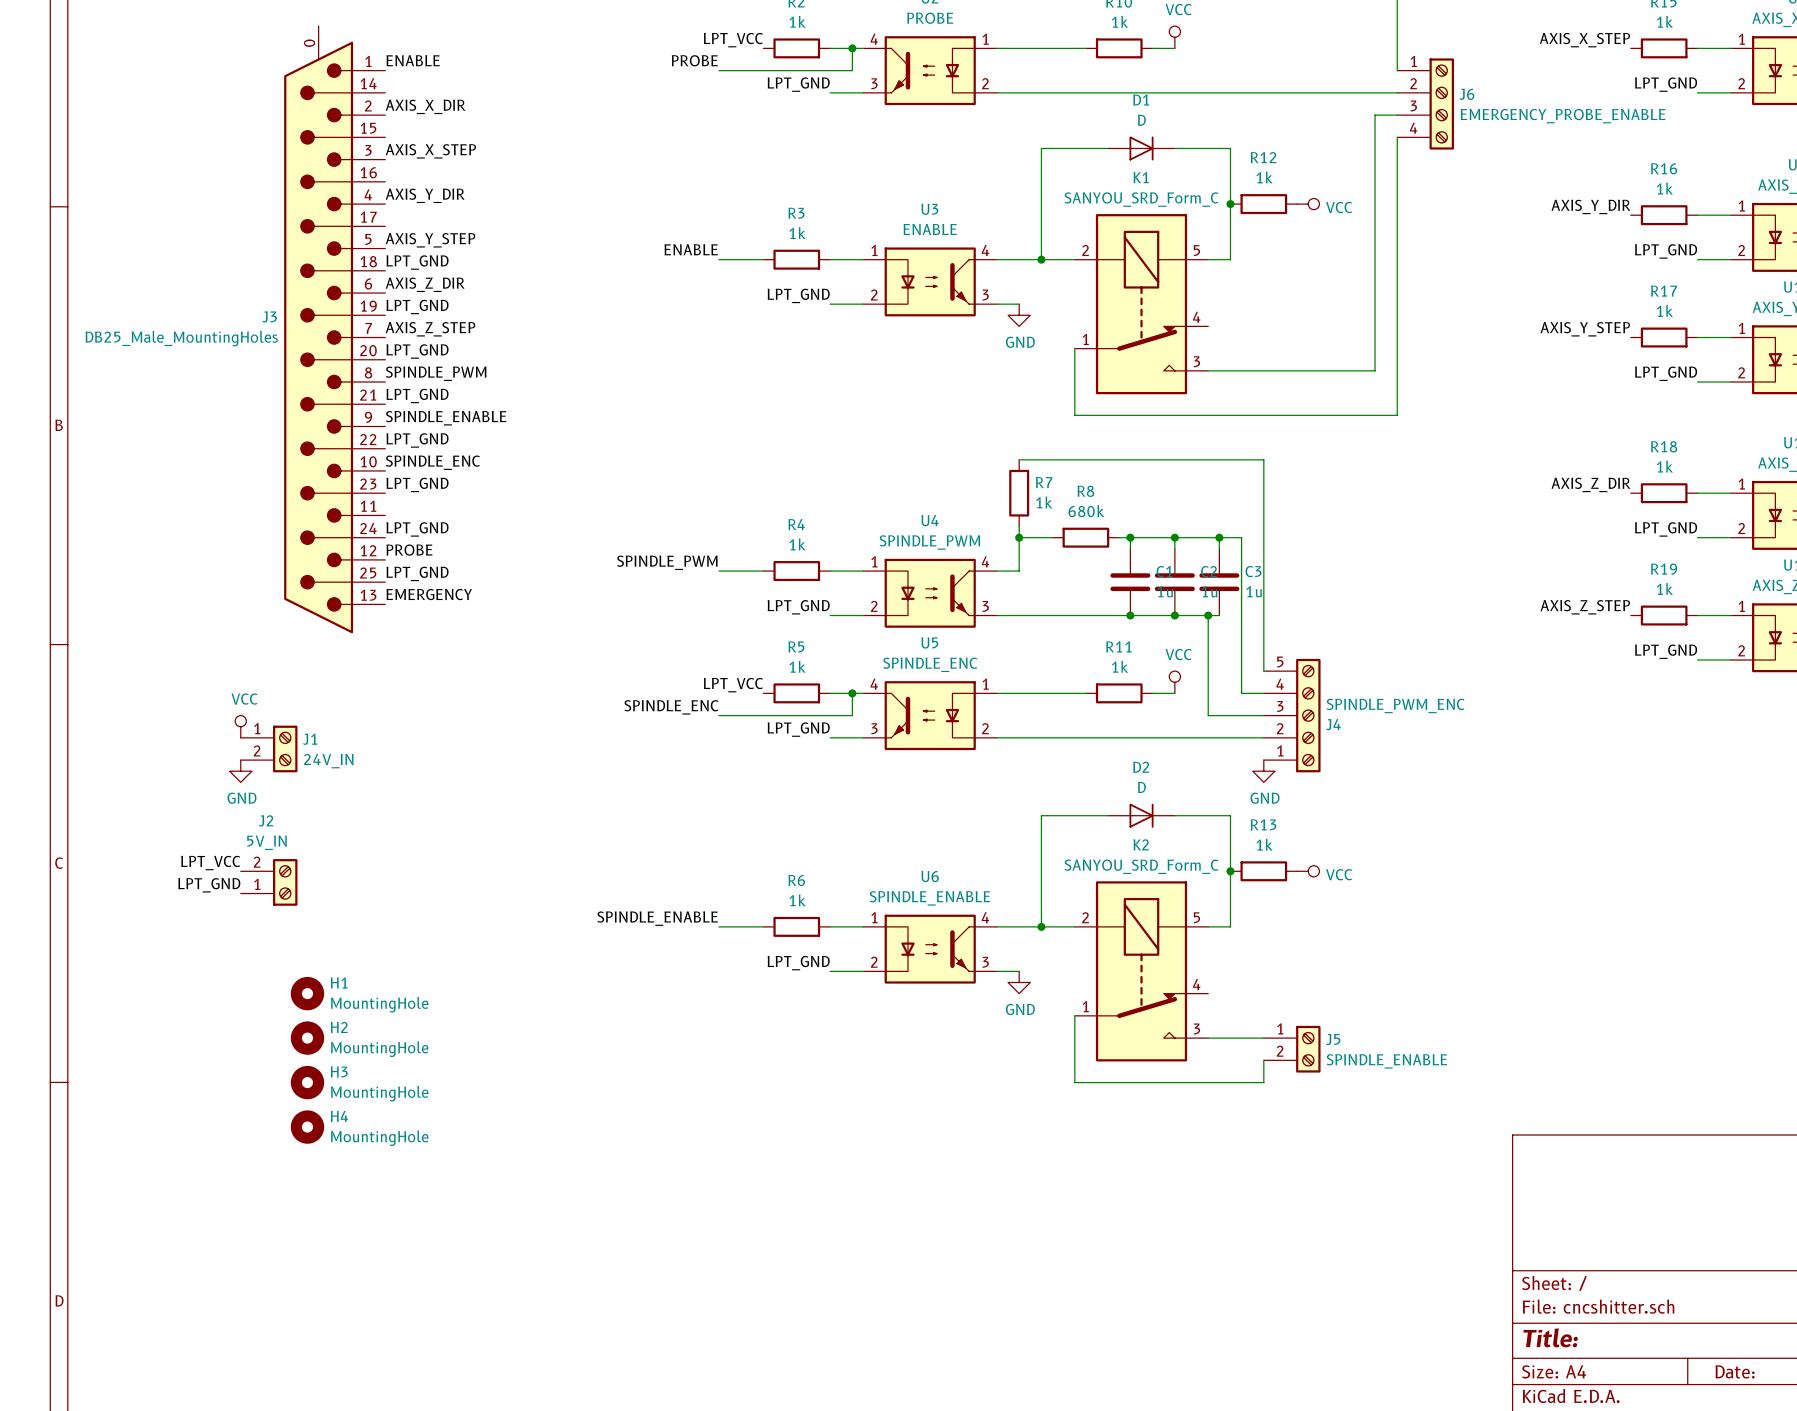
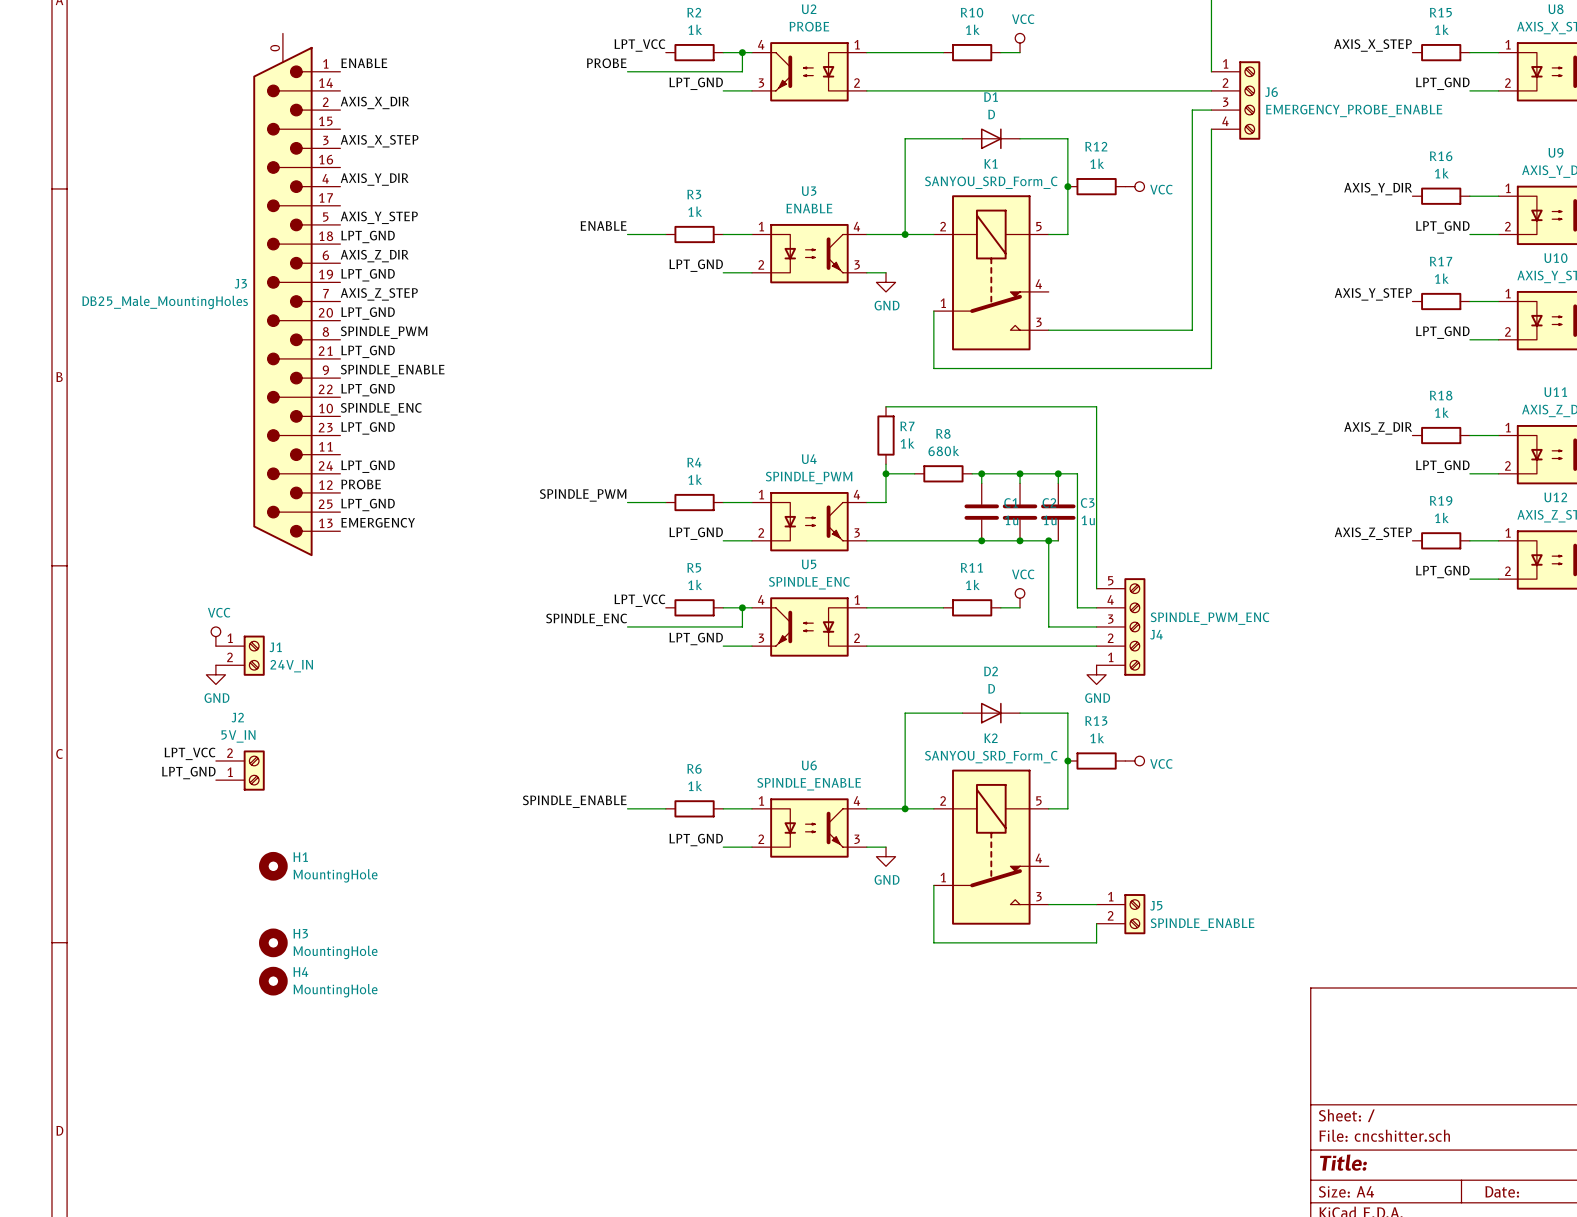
H2: MountingHole (307, 1038) -> none

